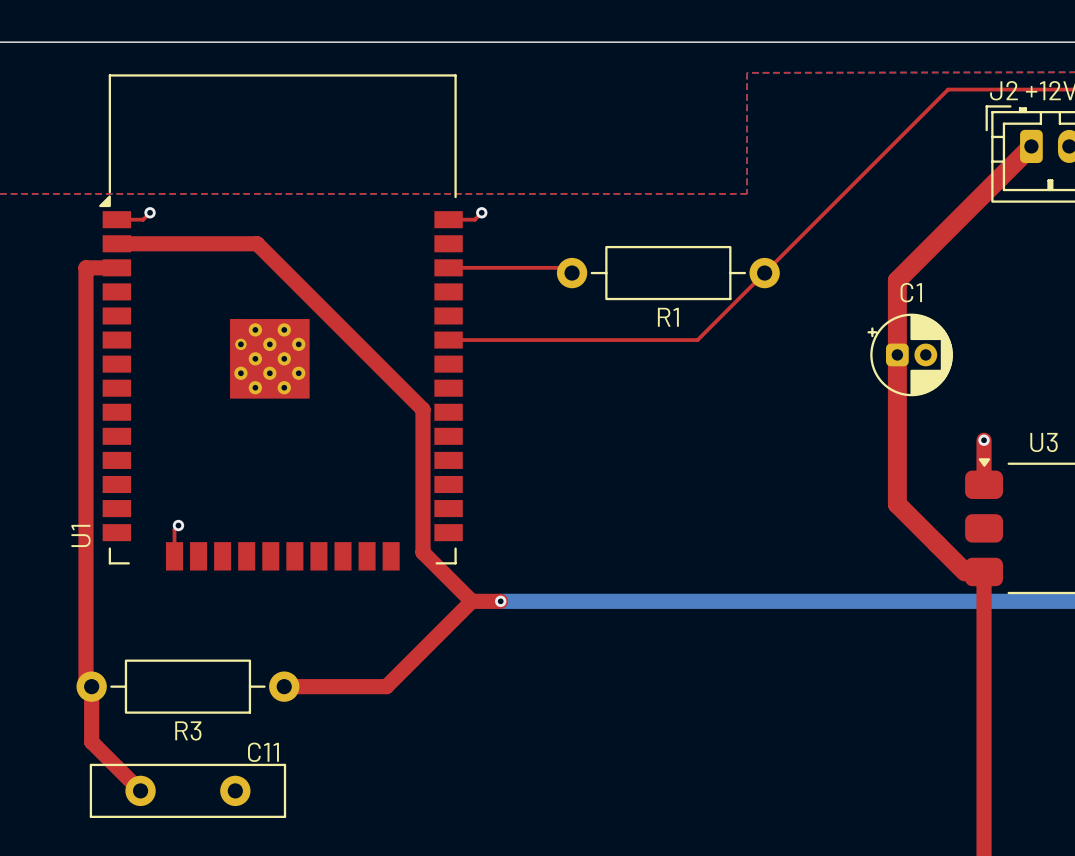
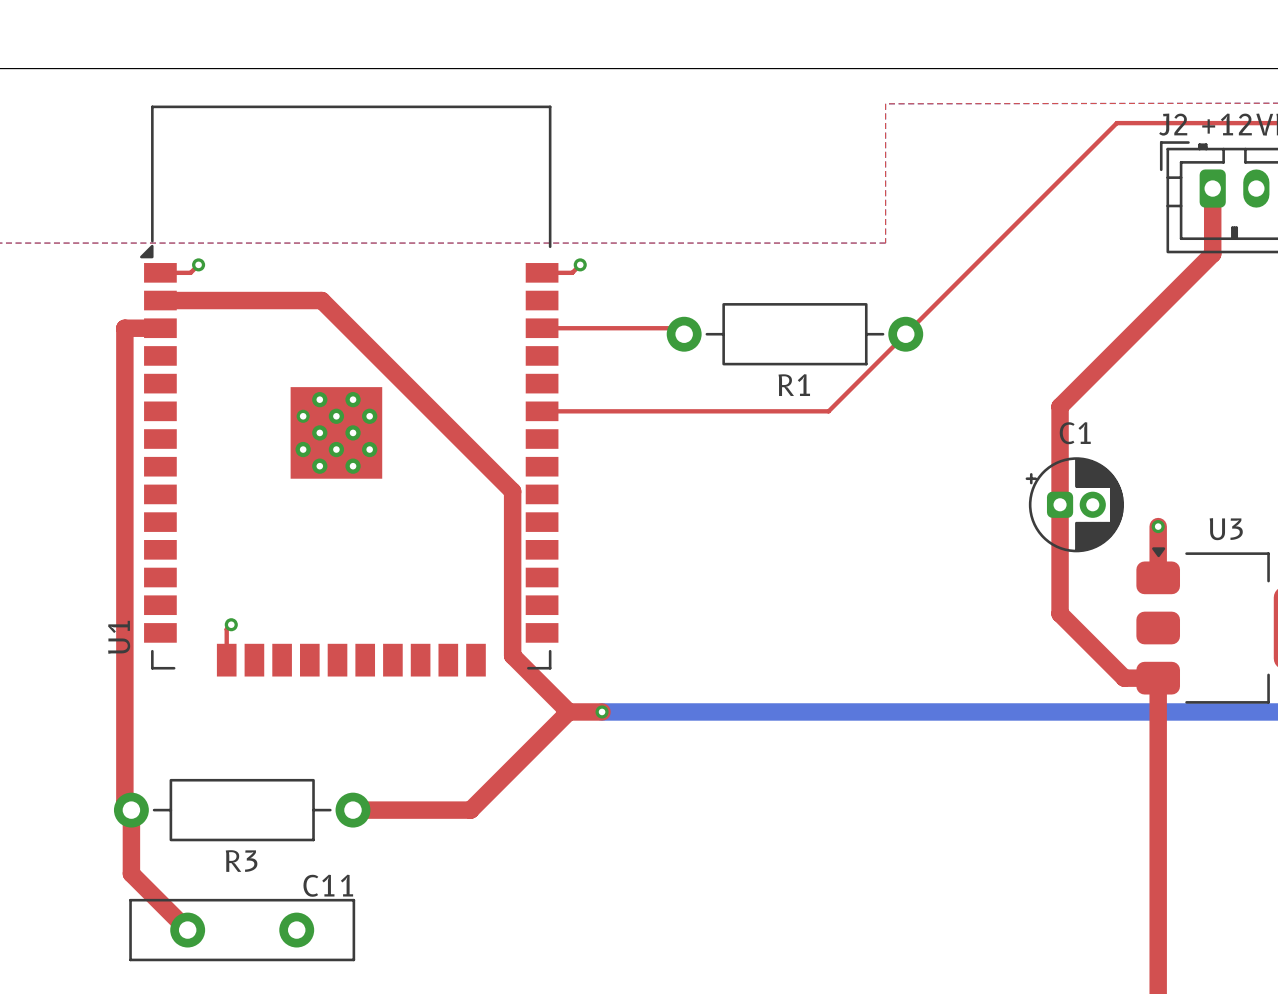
top track: (1031, 146) (897, 280) (897, 504) (965, 571) -> (1212, 188) (1212, 253) (1060, 406) (1060, 613) (1124, 678) (1136, 678)
C1 position: (910, 354) -> (1074, 504)

